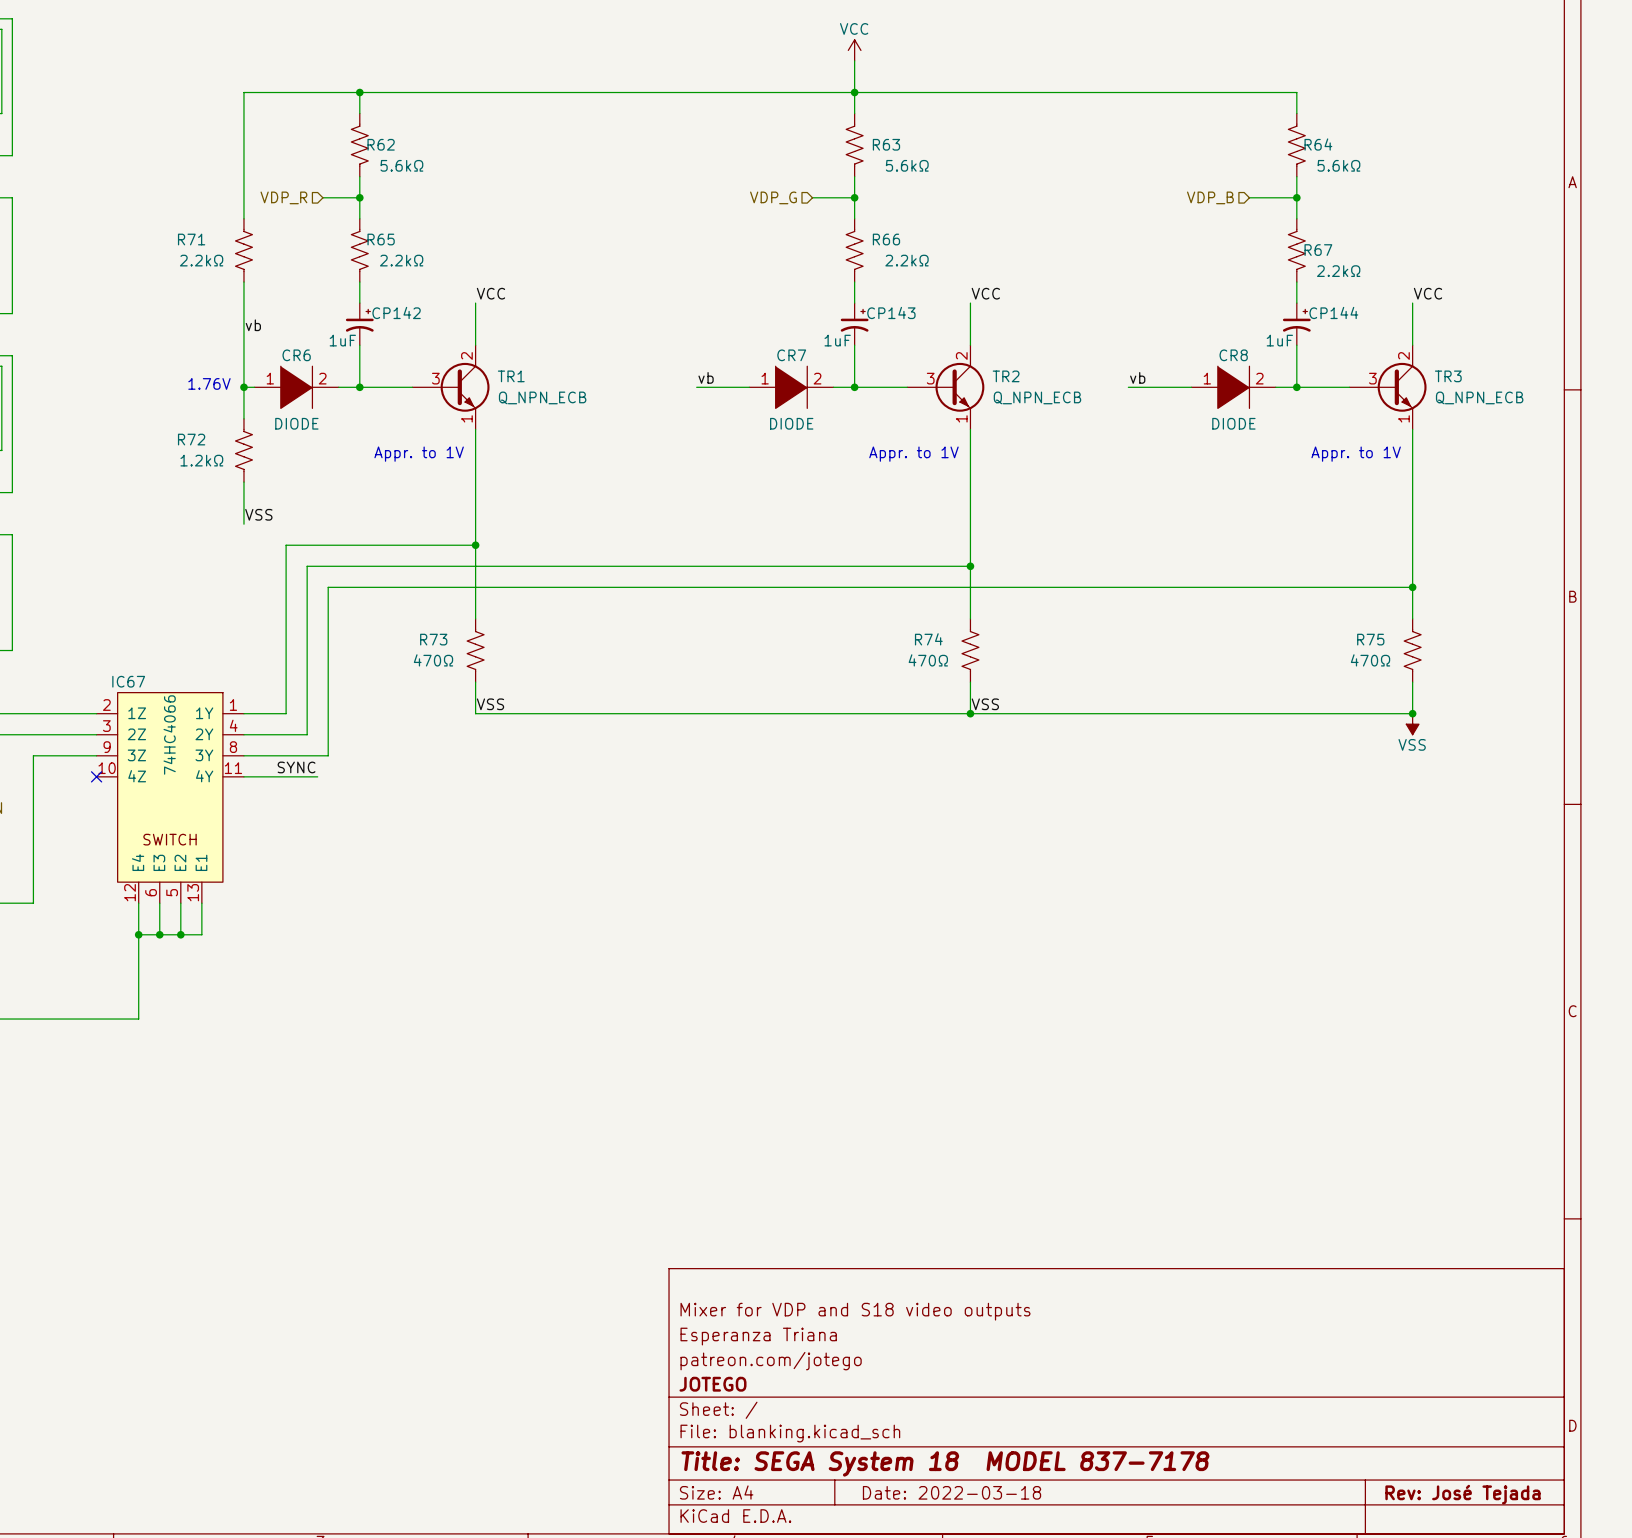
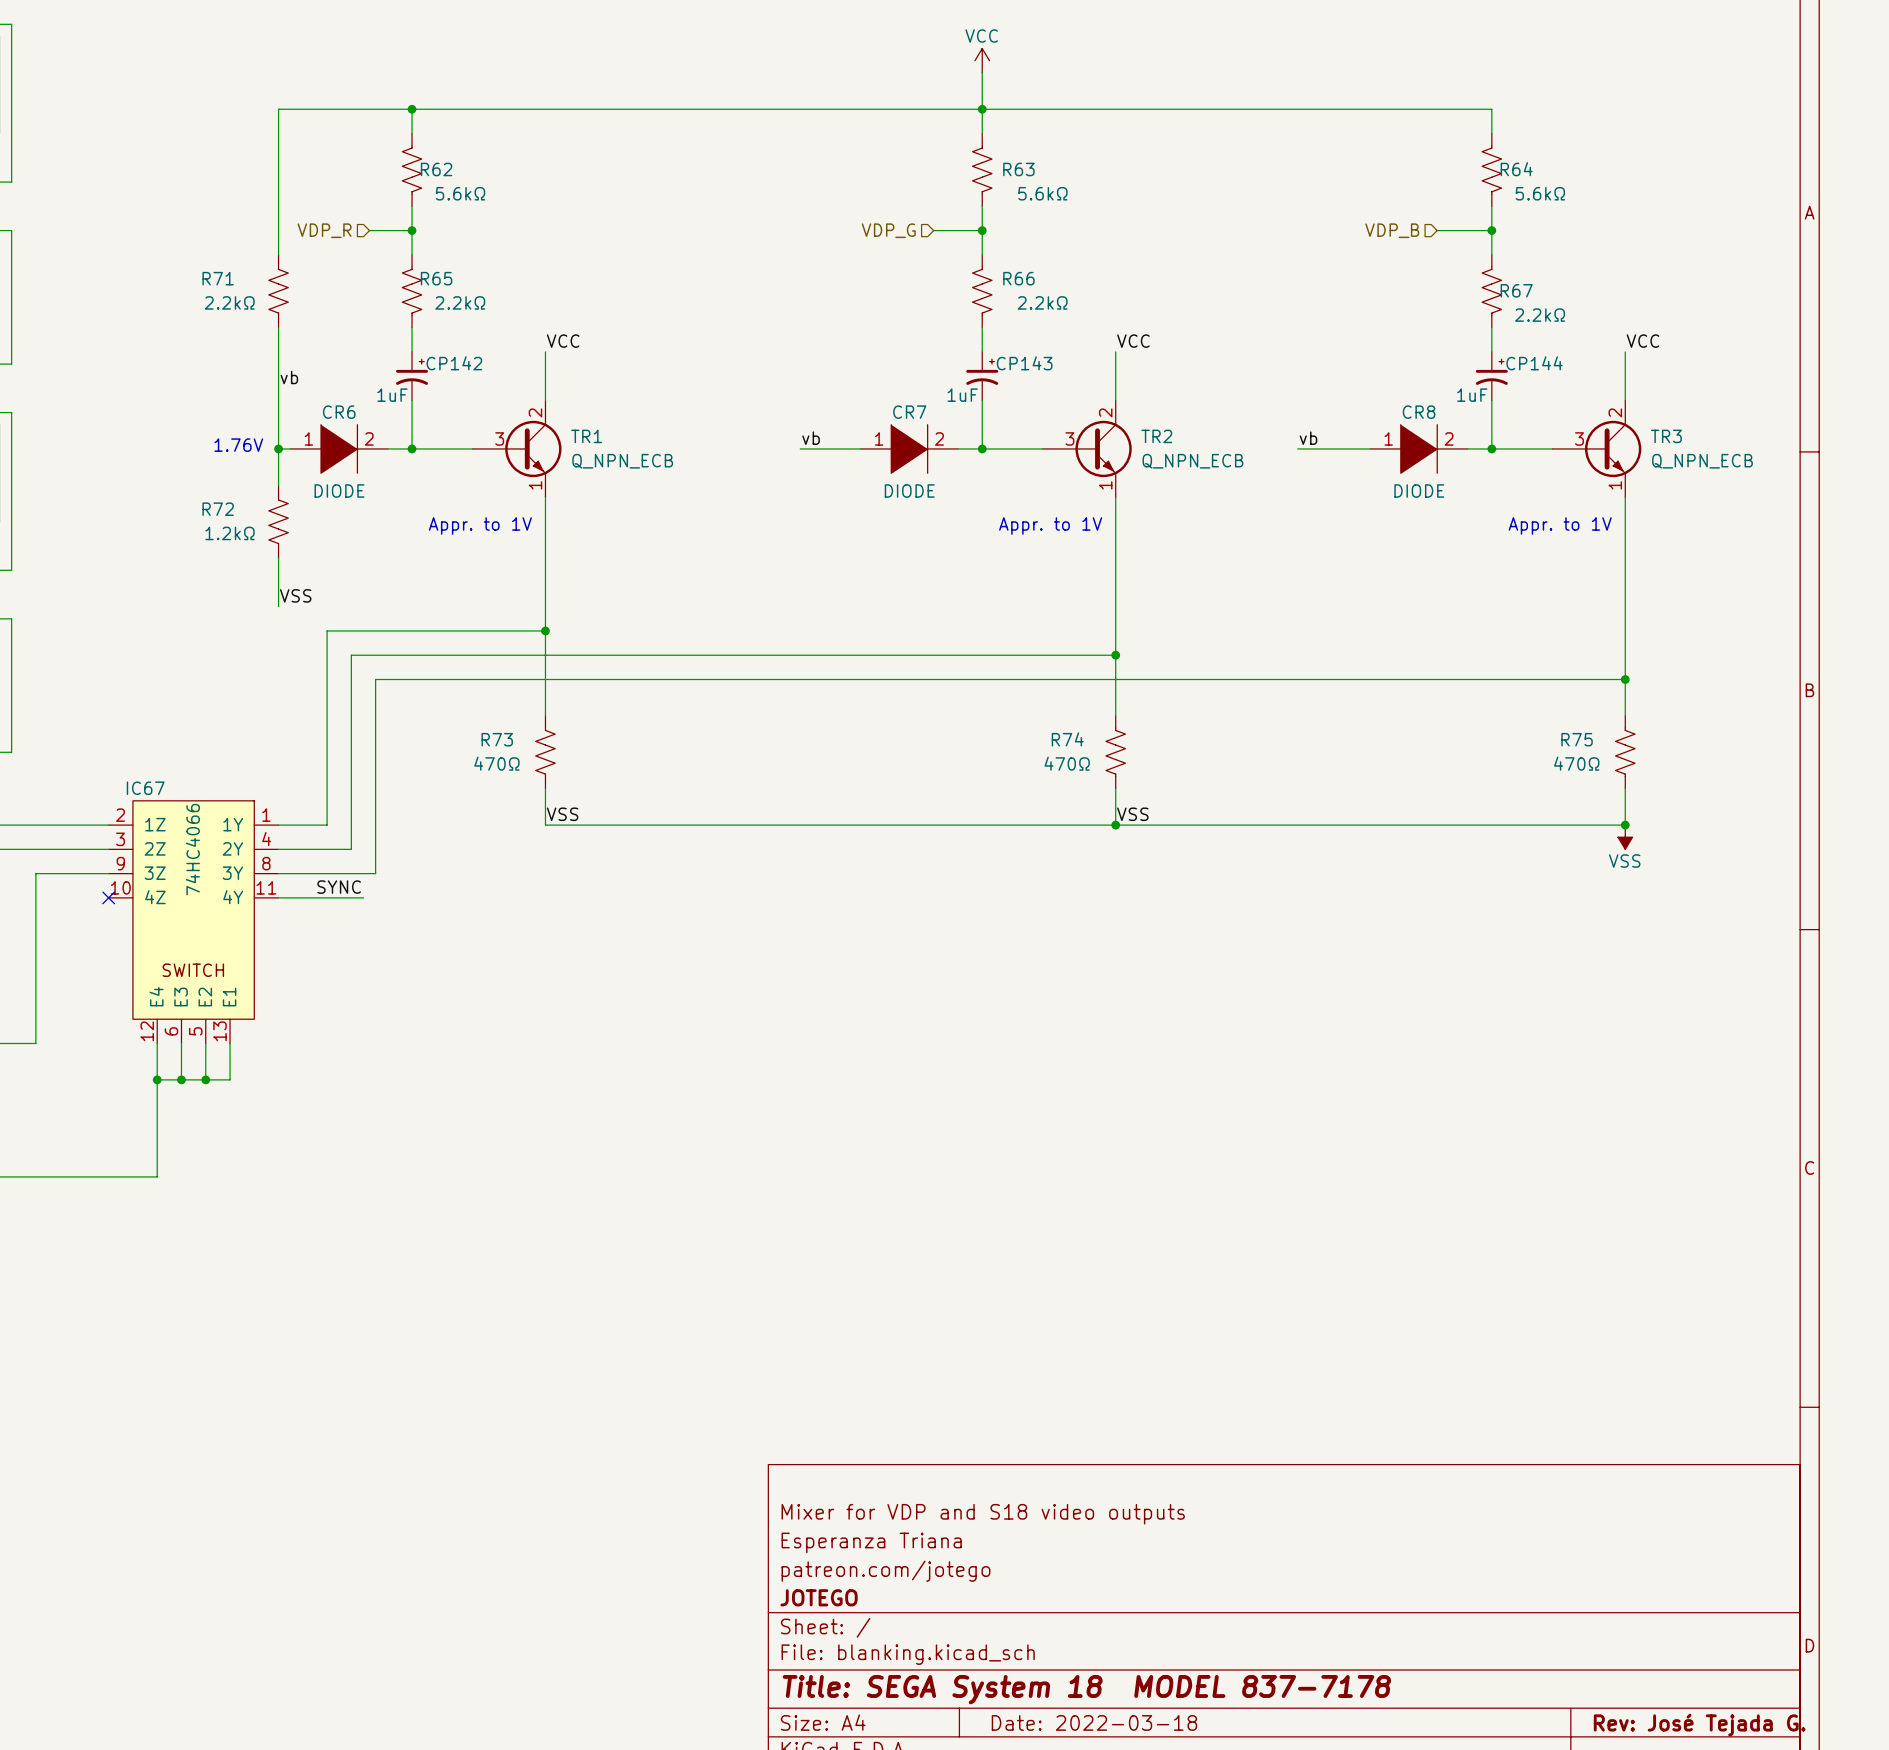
title block: Rev: José Tejada (1462, 1494) -> Rev: José Tejada G. (1699, 1725)

